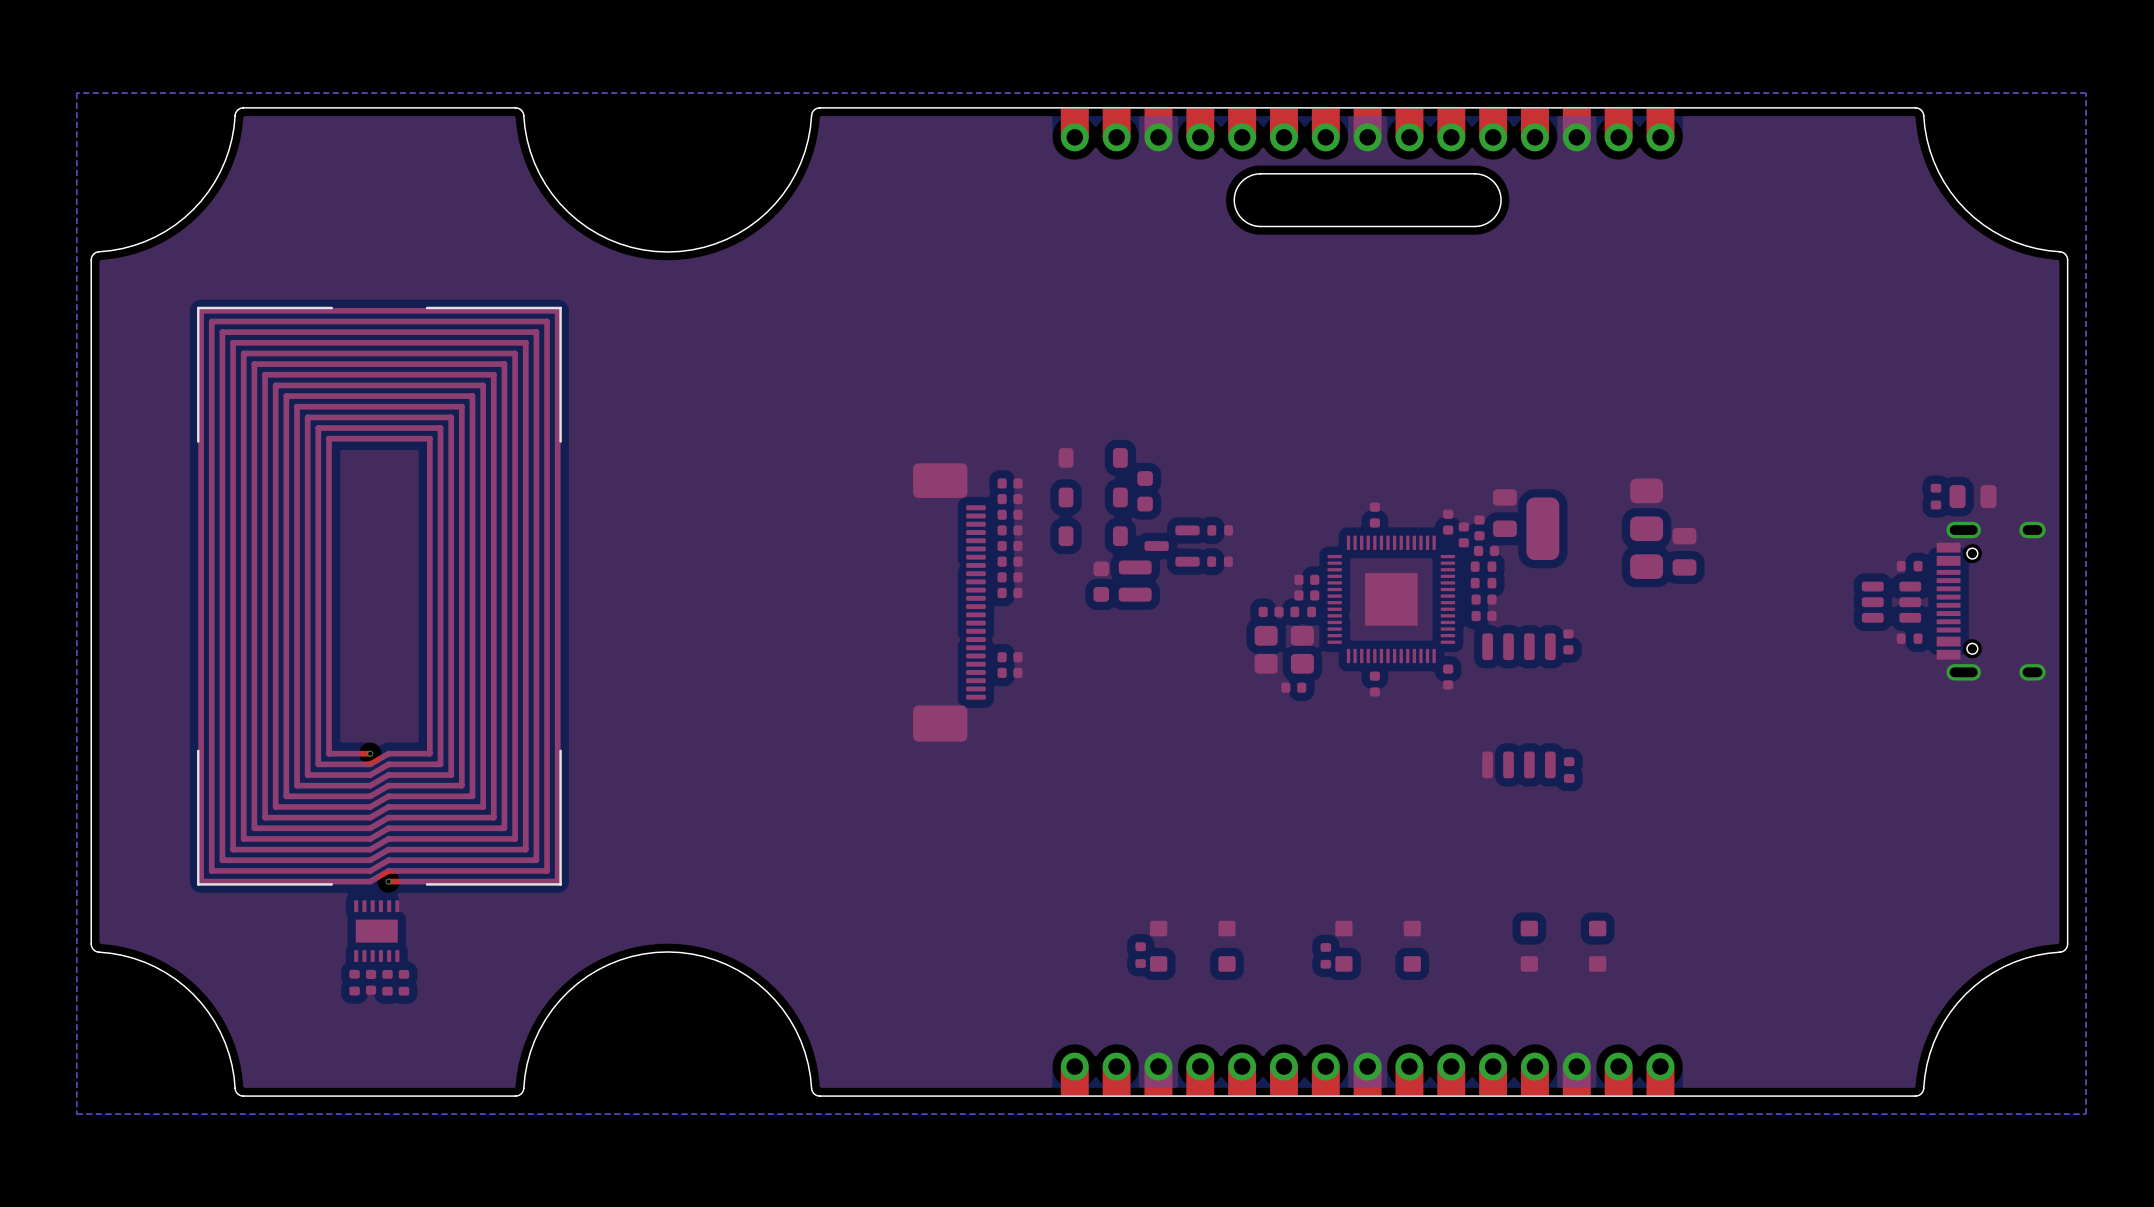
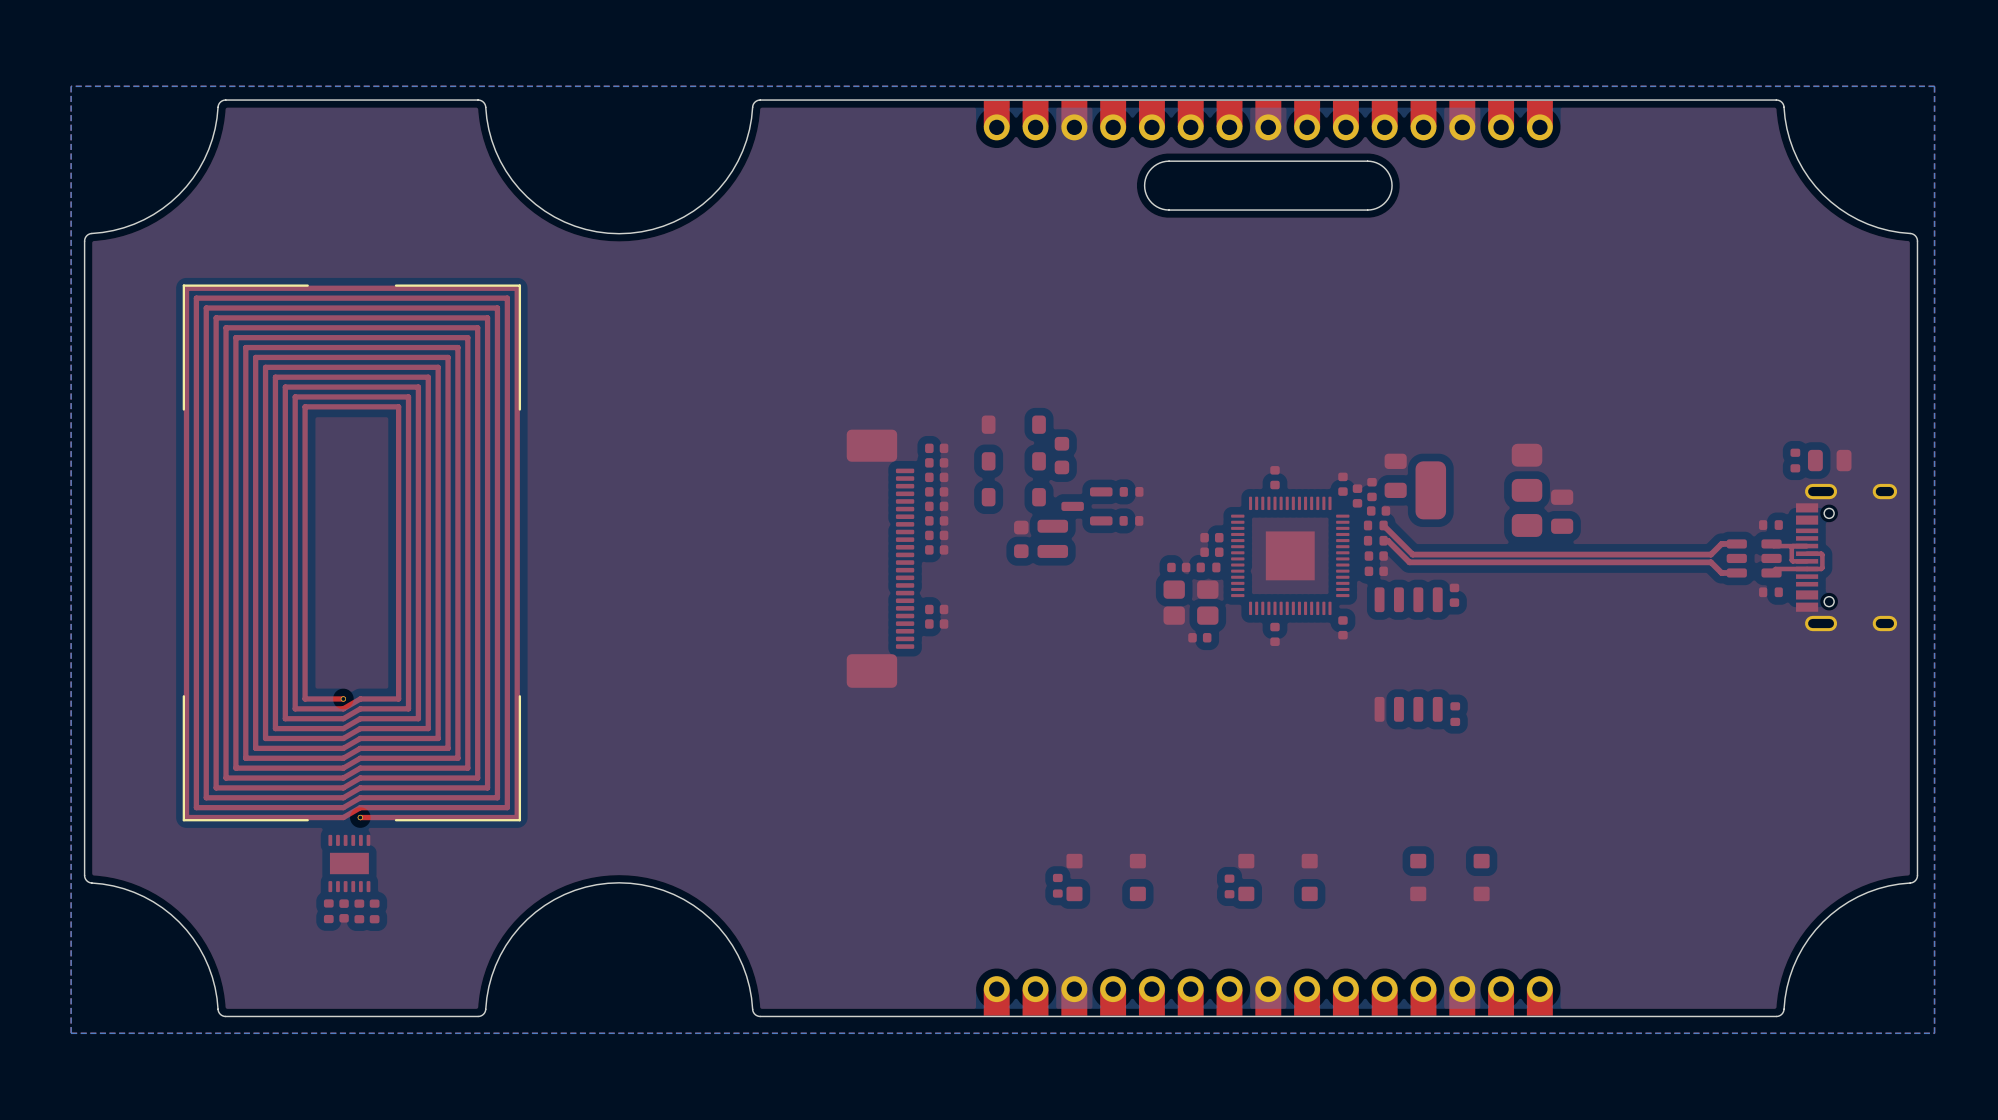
top track: none -> (1383, 525) (1412, 554) (1710, 554) (1721, 543) (1736, 543)
top track: none -> (1383, 540) (1387, 540) (1409, 562) (1710, 562) (1721, 572) (1736, 572)
top track: none -> (1792, 546) (1791, 560) (1807, 561)
top track: none -> (1807, 553) (1821, 553) (1822, 567) (1775, 568) (1771, 572)

